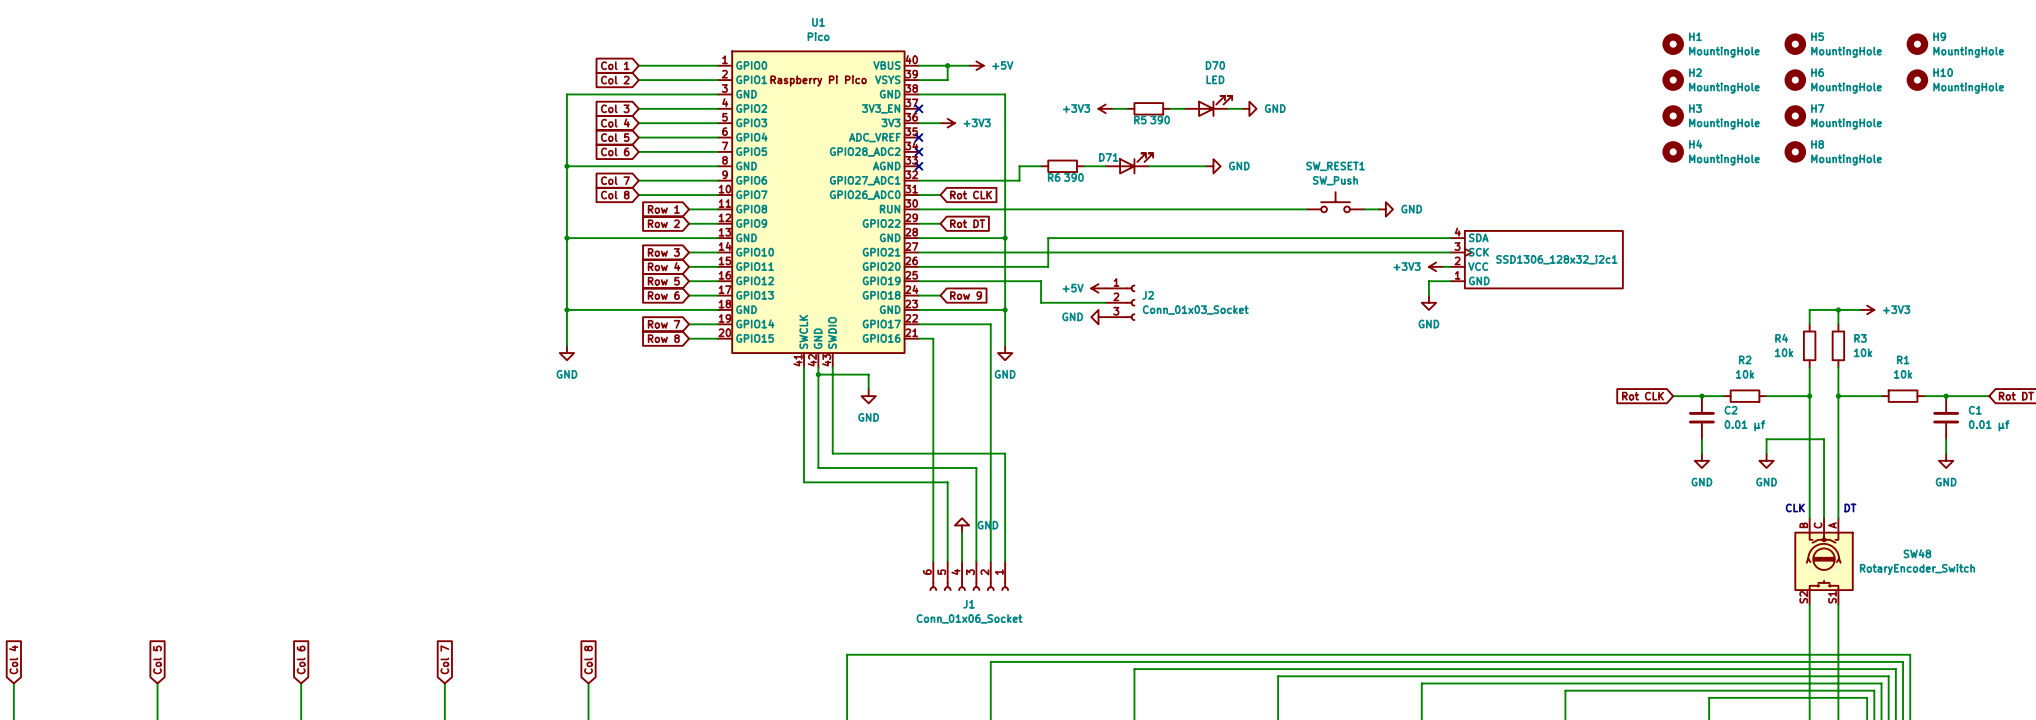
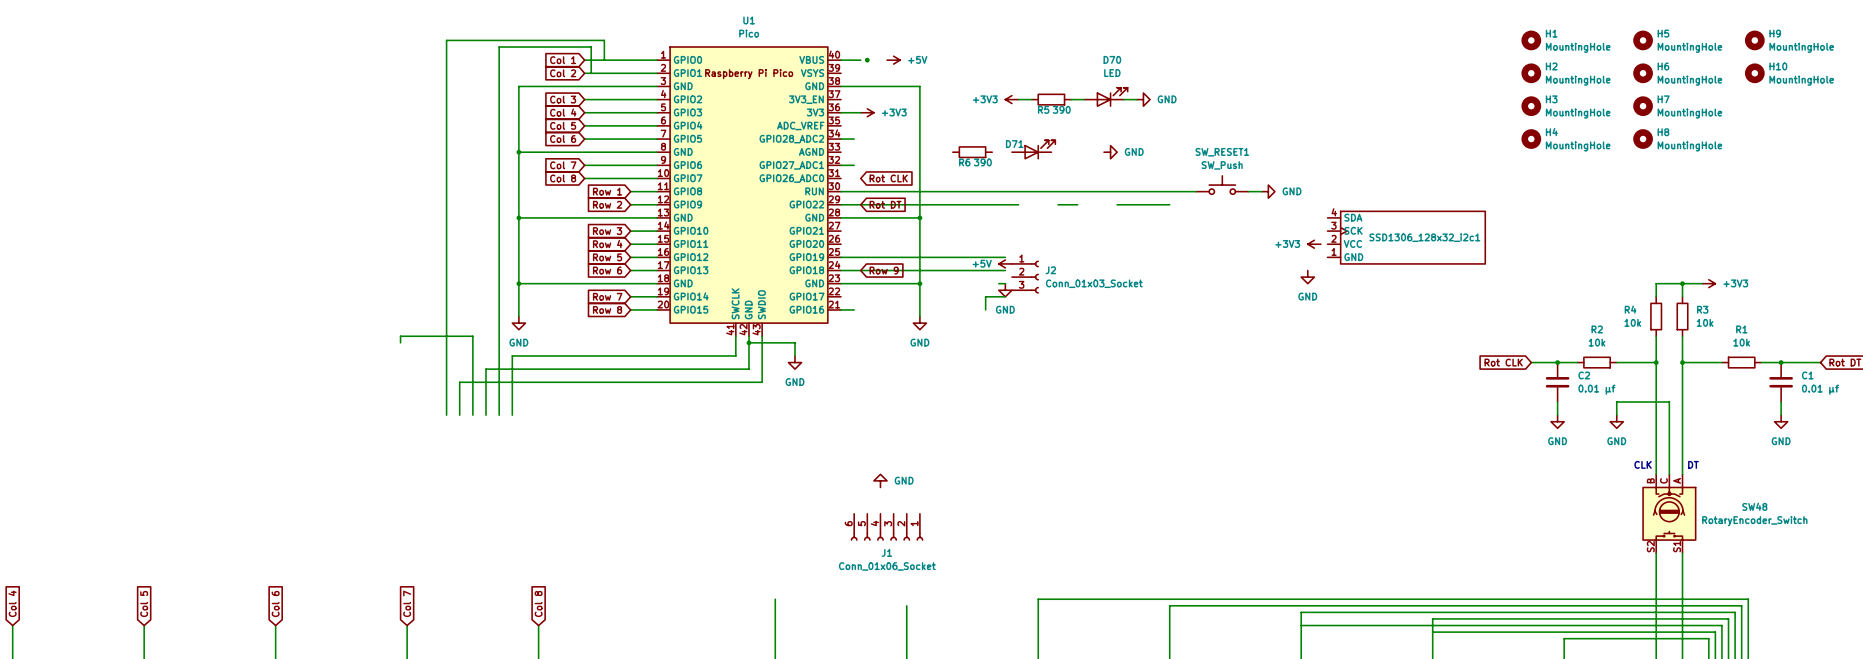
wire: none -> (604, 60) (604, 40) (446, 40) (446, 415)
wire: (940, 65) (969, 65) -> none
wire: (947, 65) (947, 80) (918, 80) -> none
wire: none -> (591, 73) (591, 47) (499, 47) (499, 415)
no-connect mark: (918, 108) -> none
no-connect mark: (918, 137) -> none
wire: none -> (841, 139) (854, 139)
no-connect mark: (918, 151) -> none
no-connect mark: (918, 166) -> none
wire: (1041, 166) (1019, 166) (1019, 180) (933, 180) -> none
wire: (1084, 166) (1105, 166) -> (1057, 204) (1077, 204)
wire: (1148, 166) (1206, 166) -> (1117, 204) (1169, 204)
wire: (918, 195) (940, 195) -> none
wire: none -> (860, 204) (1018, 204)
wire: (1450, 238) (1048, 238) (1048, 266) (918, 266) -> none
wire: (918, 252) (1450, 252) -> none
wire: (1443, 266) (1450, 266) -> none
wire: (1041, 281) (1041, 302) (1105, 302) -> (952, 257) (1005, 257)
wire: (1450, 281) (1428, 281) (1428, 295) -> none
wire: none -> (860, 270) (1005, 270)
wire: none -> (998, 283) (1005, 283)
power symbol rotation: 0° (1098, 317) -> 90° counterclockwise (1005, 290)
wire: (918, 324) (990, 324) (990, 561) -> none
wire: none -> (1005, 296) (985, 296) (985, 309)
wire: (933, 338) (933, 561) -> none
wire: none -> (400, 342) (400, 336) (472, 336) (472, 415)
wire: (804, 388) (804, 482) (947, 482) (947, 561) -> (735, 355) (512, 355) (512, 415)
wire: (818, 403) (818, 467) (976, 467) (976, 561) -> (748, 369) (486, 369) (486, 415)
wire: (832, 417) (832, 453) (1005, 453) (1005, 561) -> (762, 382) (459, 382) (459, 415)
wire: (962, 532) (962, 561) -> none
wire: (847, 654) (1134, 654) -> (1038, 612) (1038, 599)
wire: (990, 661) (1278, 661) -> (1169, 618) (1169, 605)
wire: (1134, 669) (1421, 669) -> (1301, 625) (1301, 612)
wire: (1278, 676) (1565, 676) -> (1432, 632) (1432, 618)

